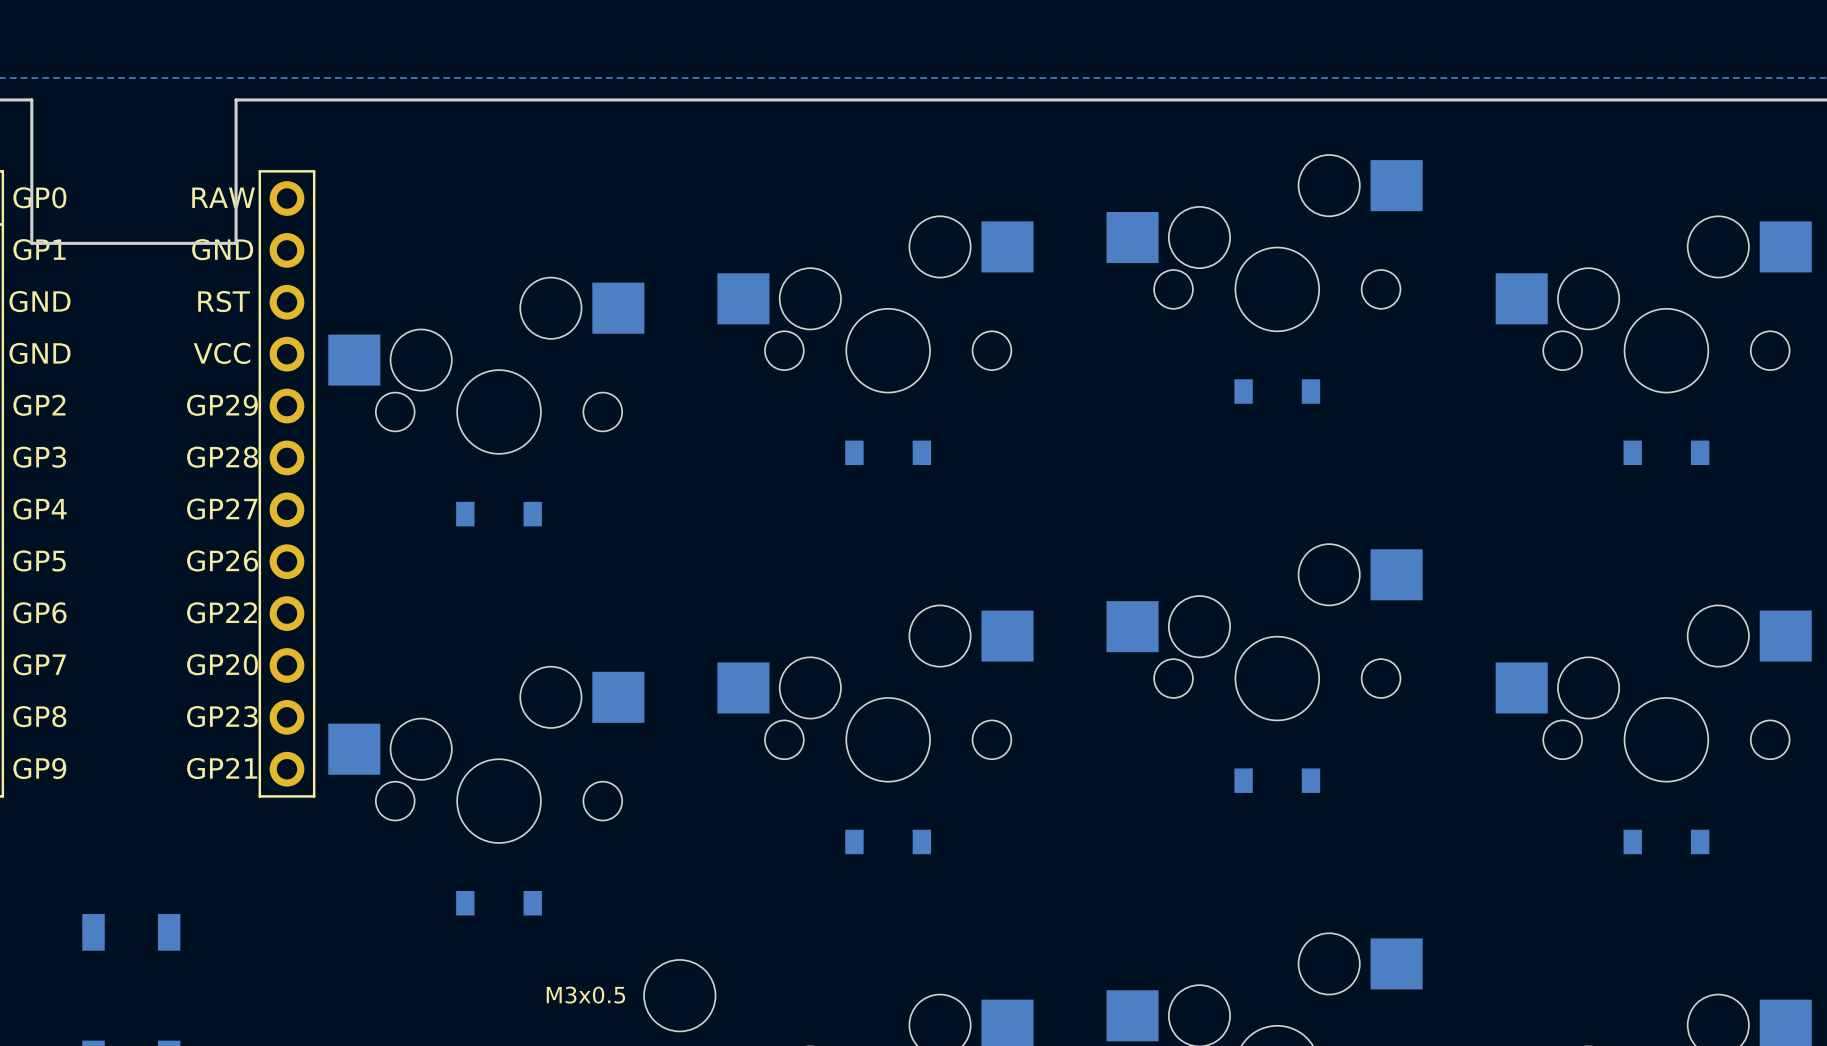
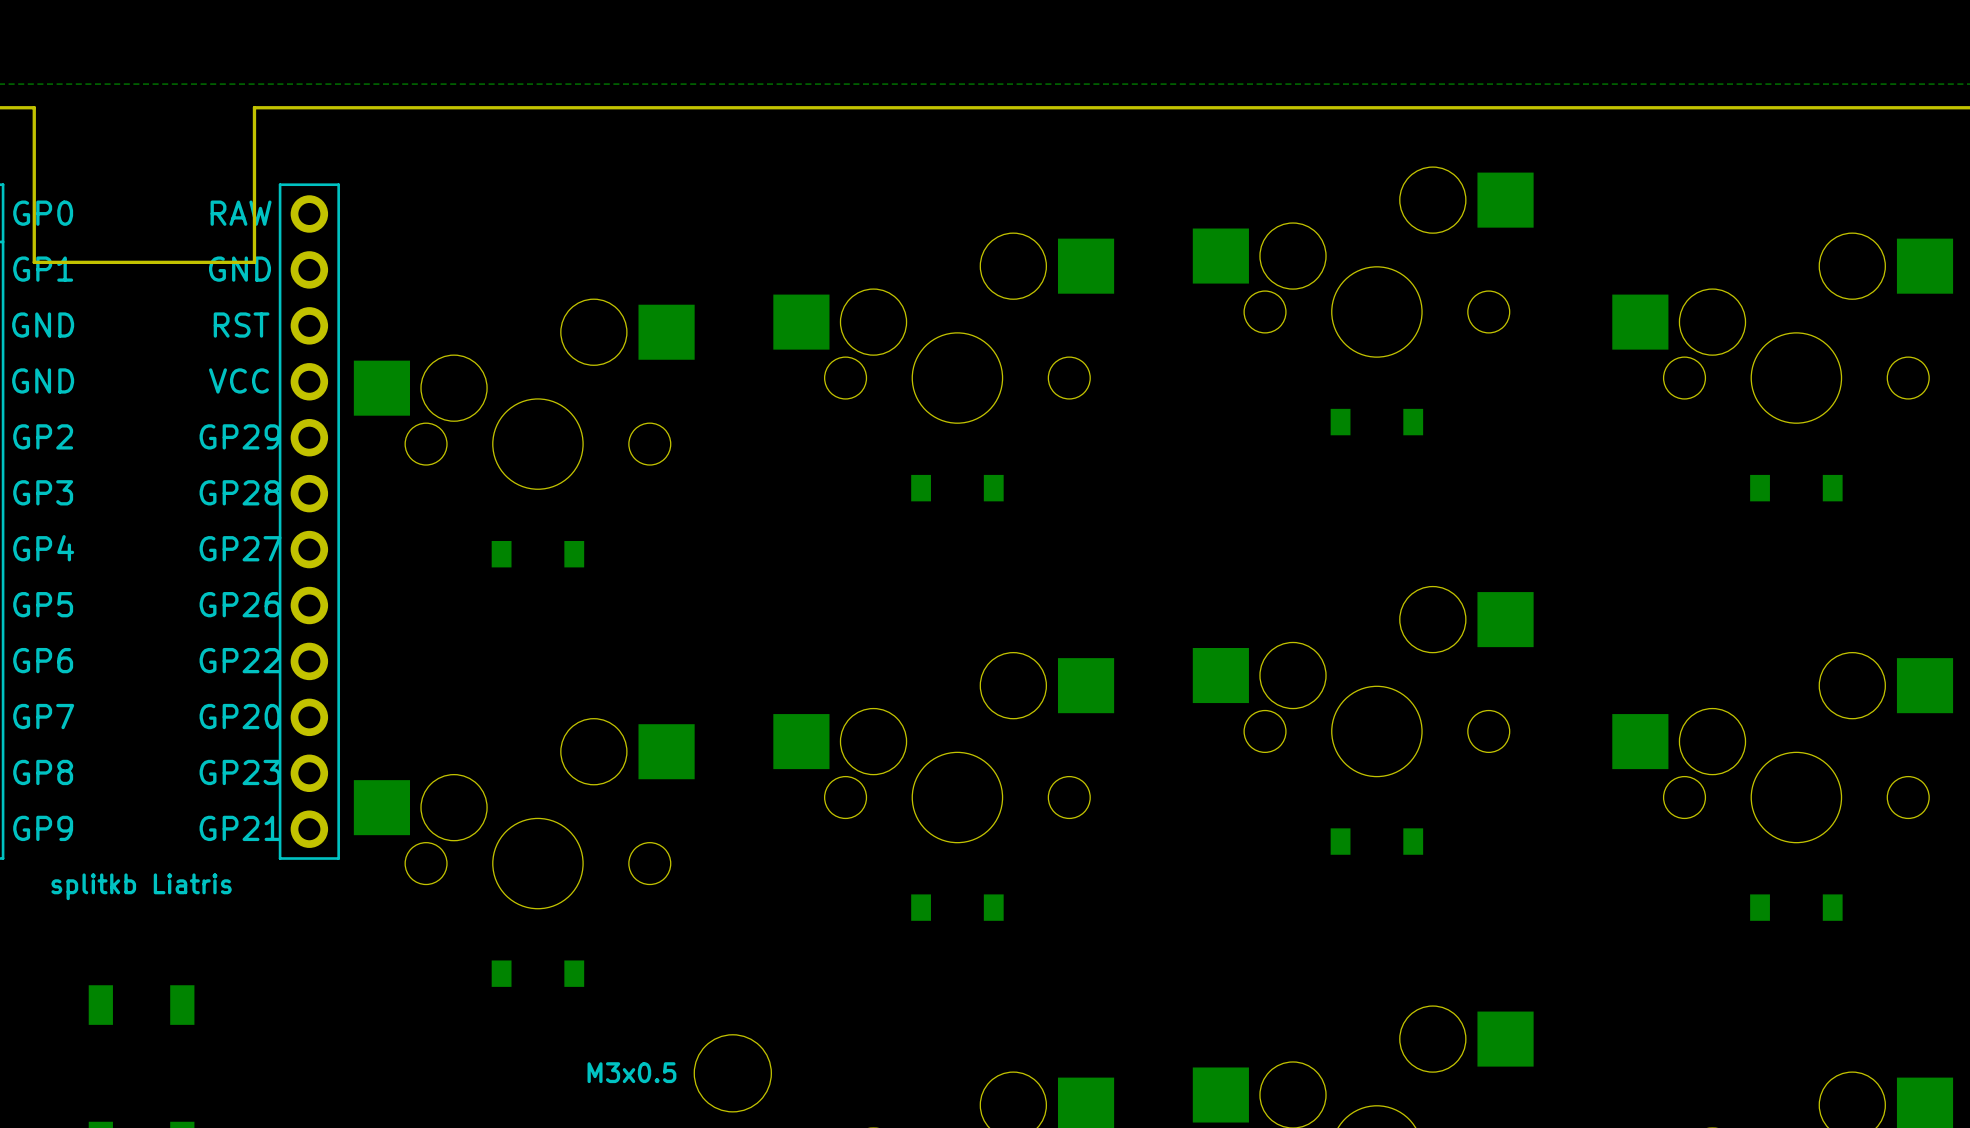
text: none -> splitkb Liatris (141, 886)

